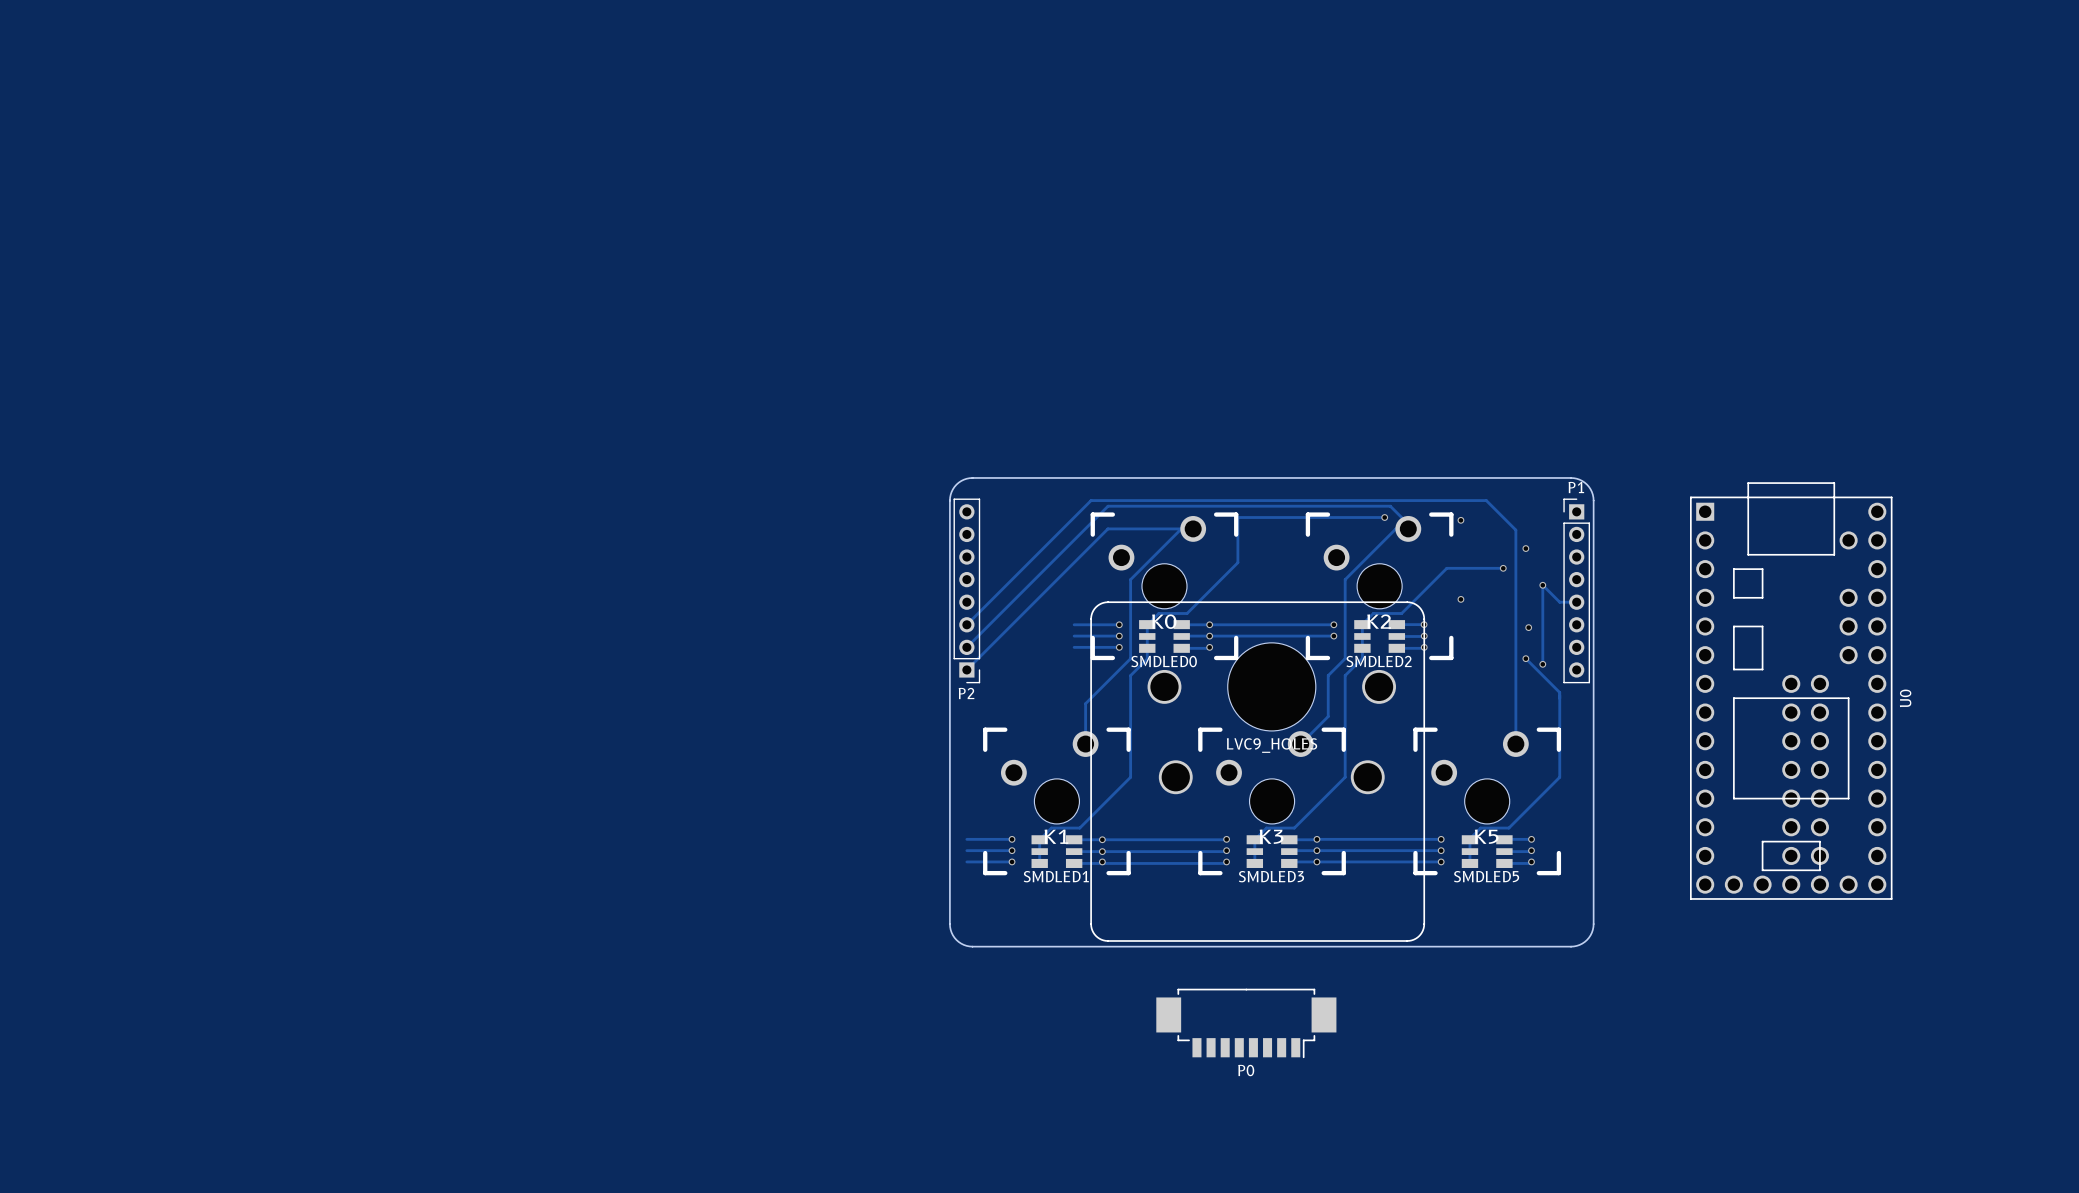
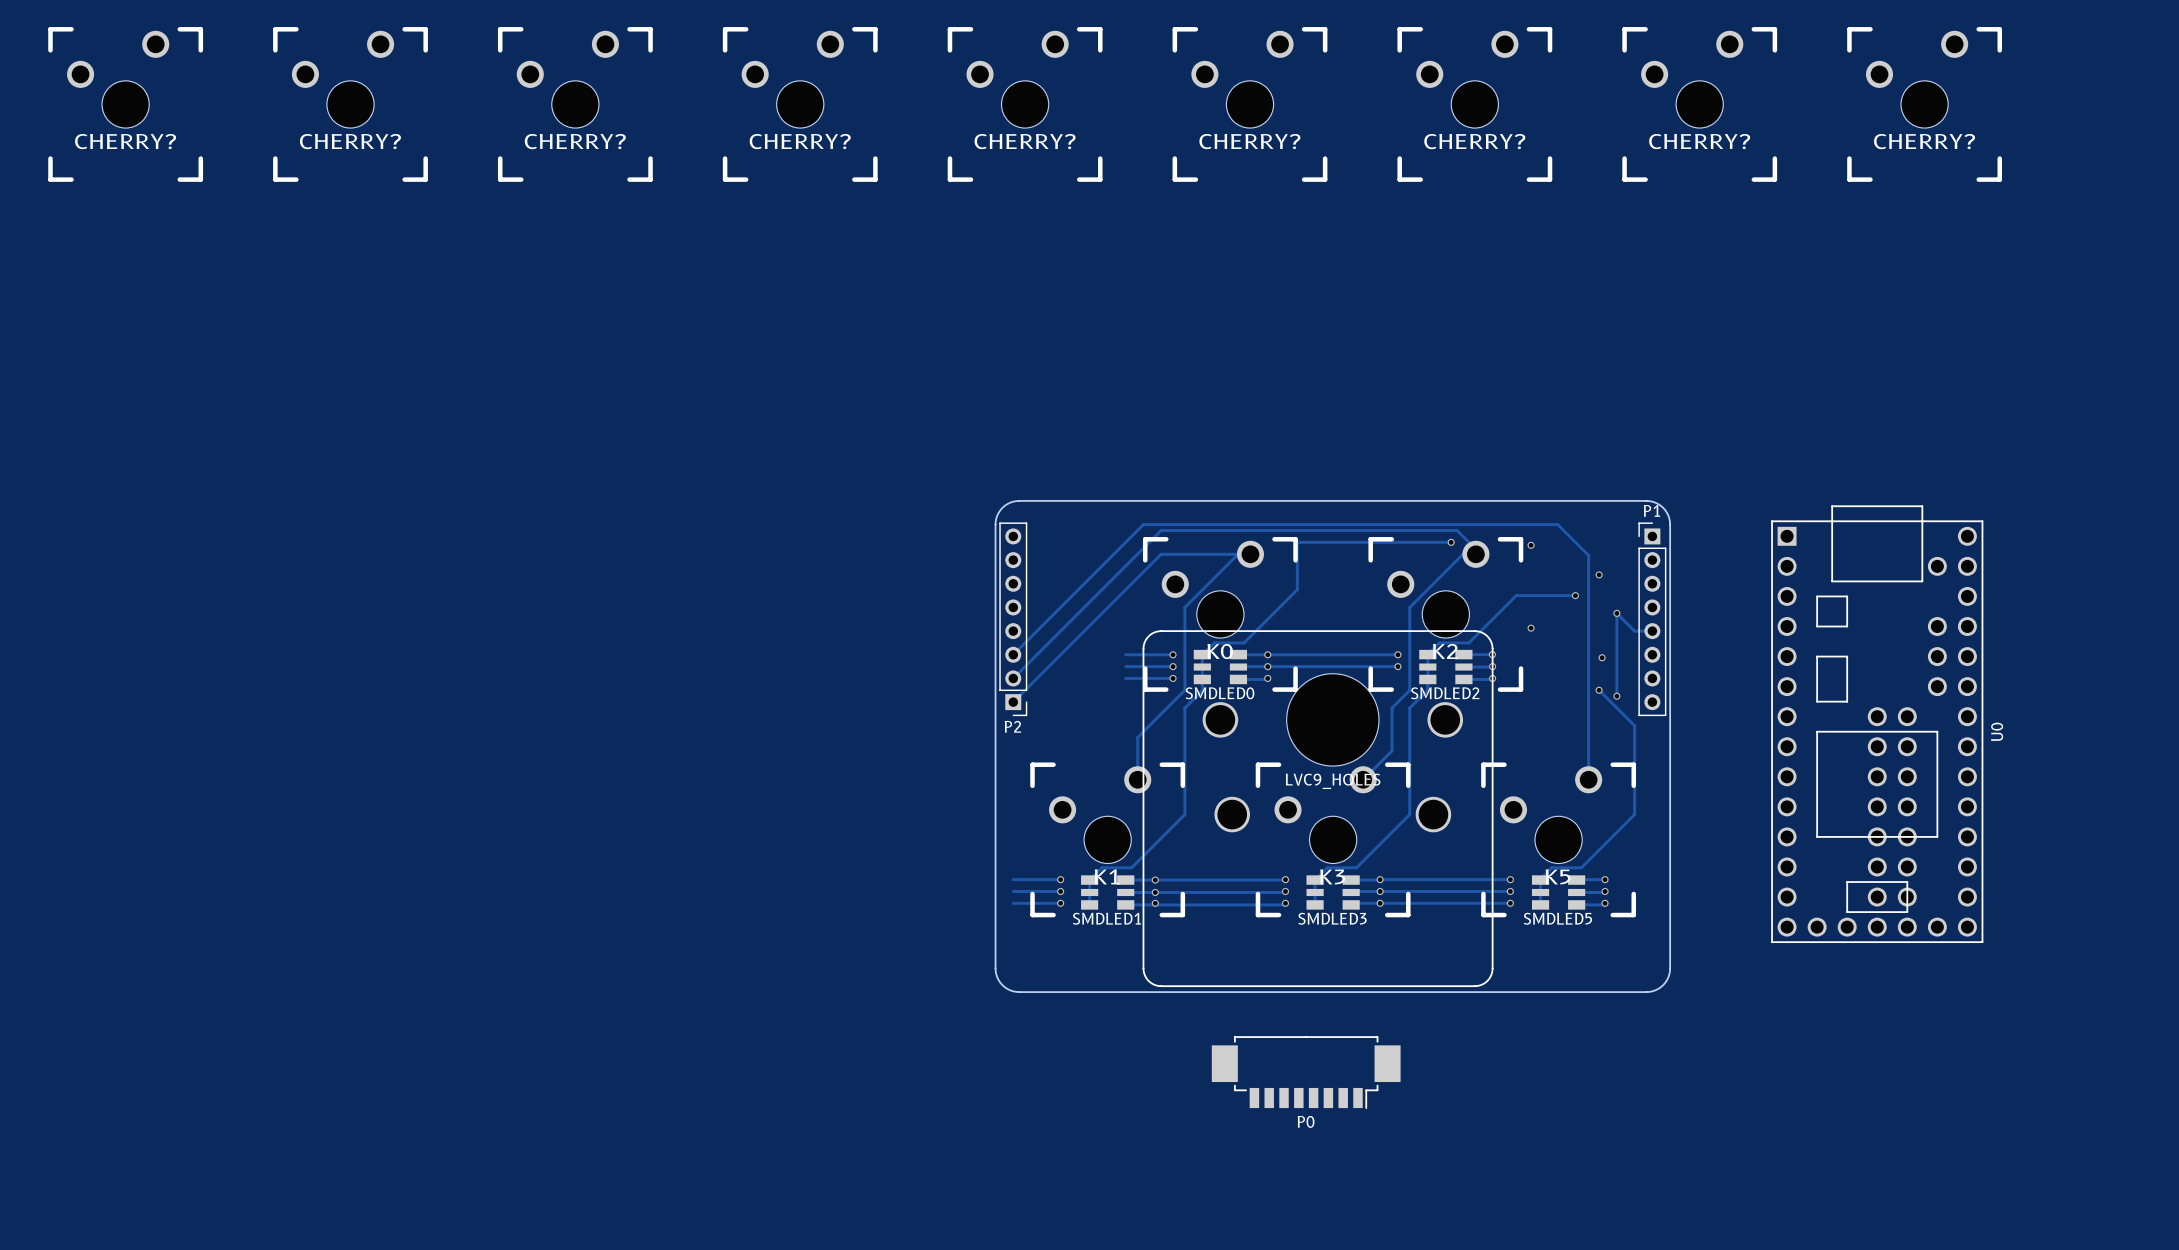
CHERRY?: none -> (125, 104)
CHERRY?: none -> (350, 104)
CHERRY?: none -> (575, 104)
CHERRY?: none -> (800, 104)
CHERRY?: none -> (1025, 104)
CHERRY?: none -> (1249, 104)
CHERRY?: none -> (1474, 104)
CHERRY?: none -> (1699, 104)
CHERRY?: none -> (1924, 104)

